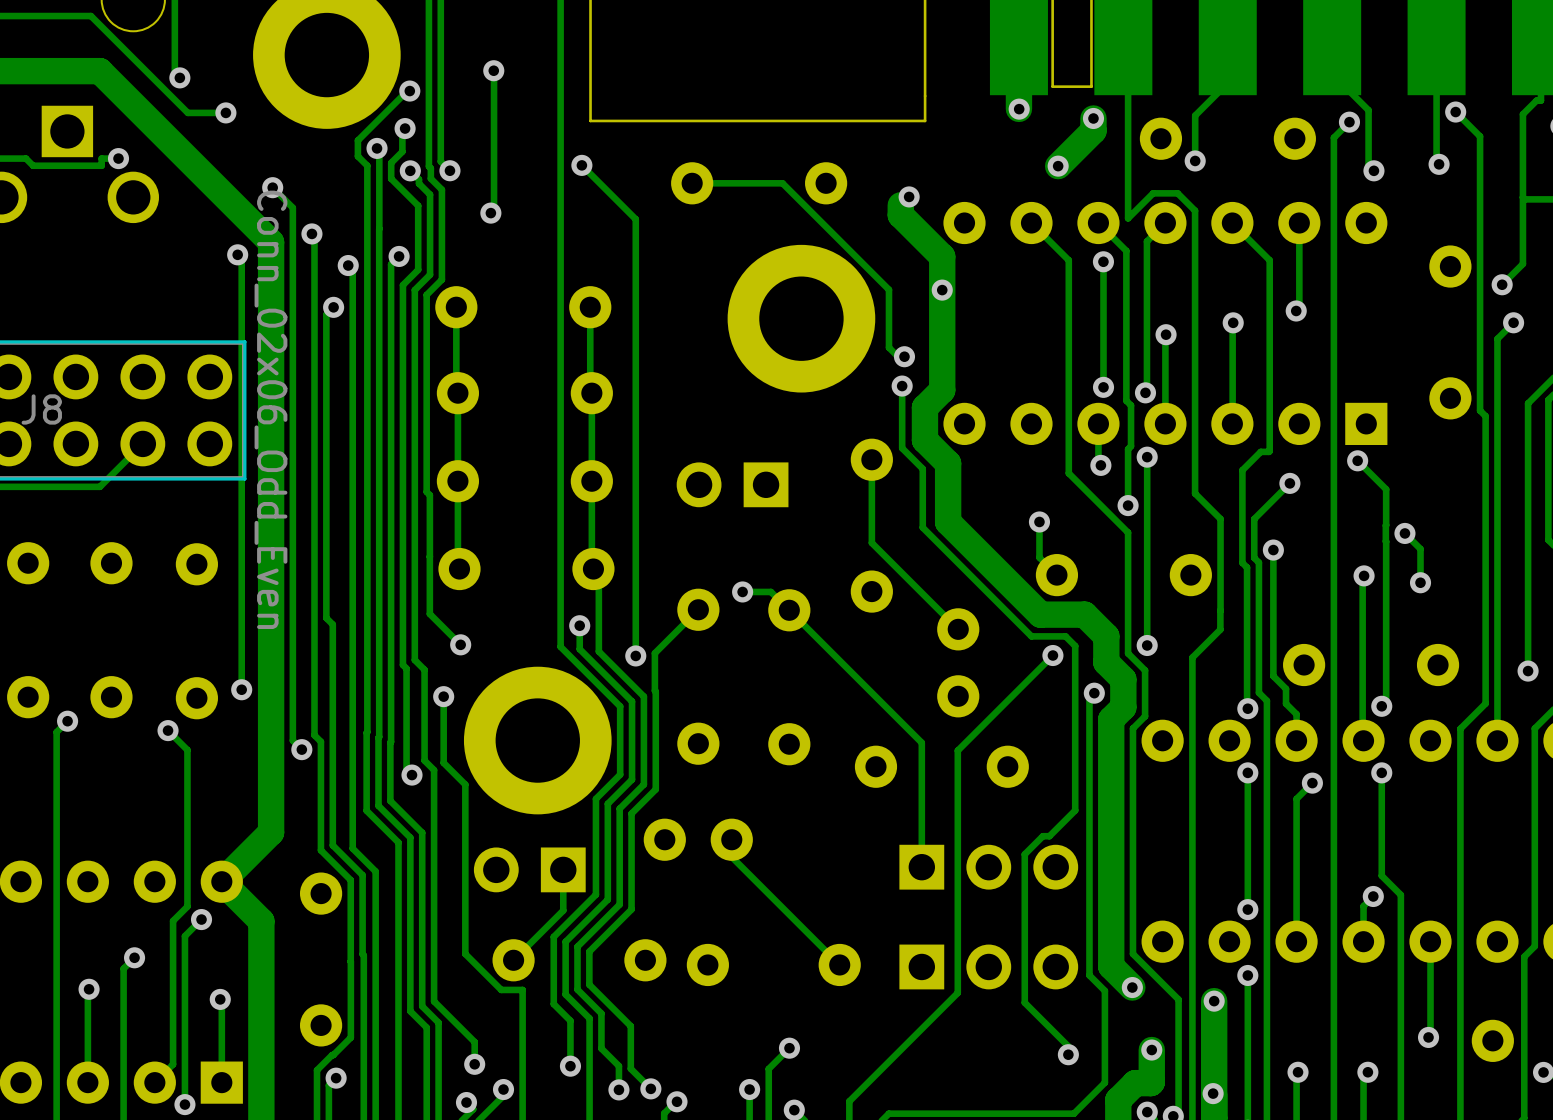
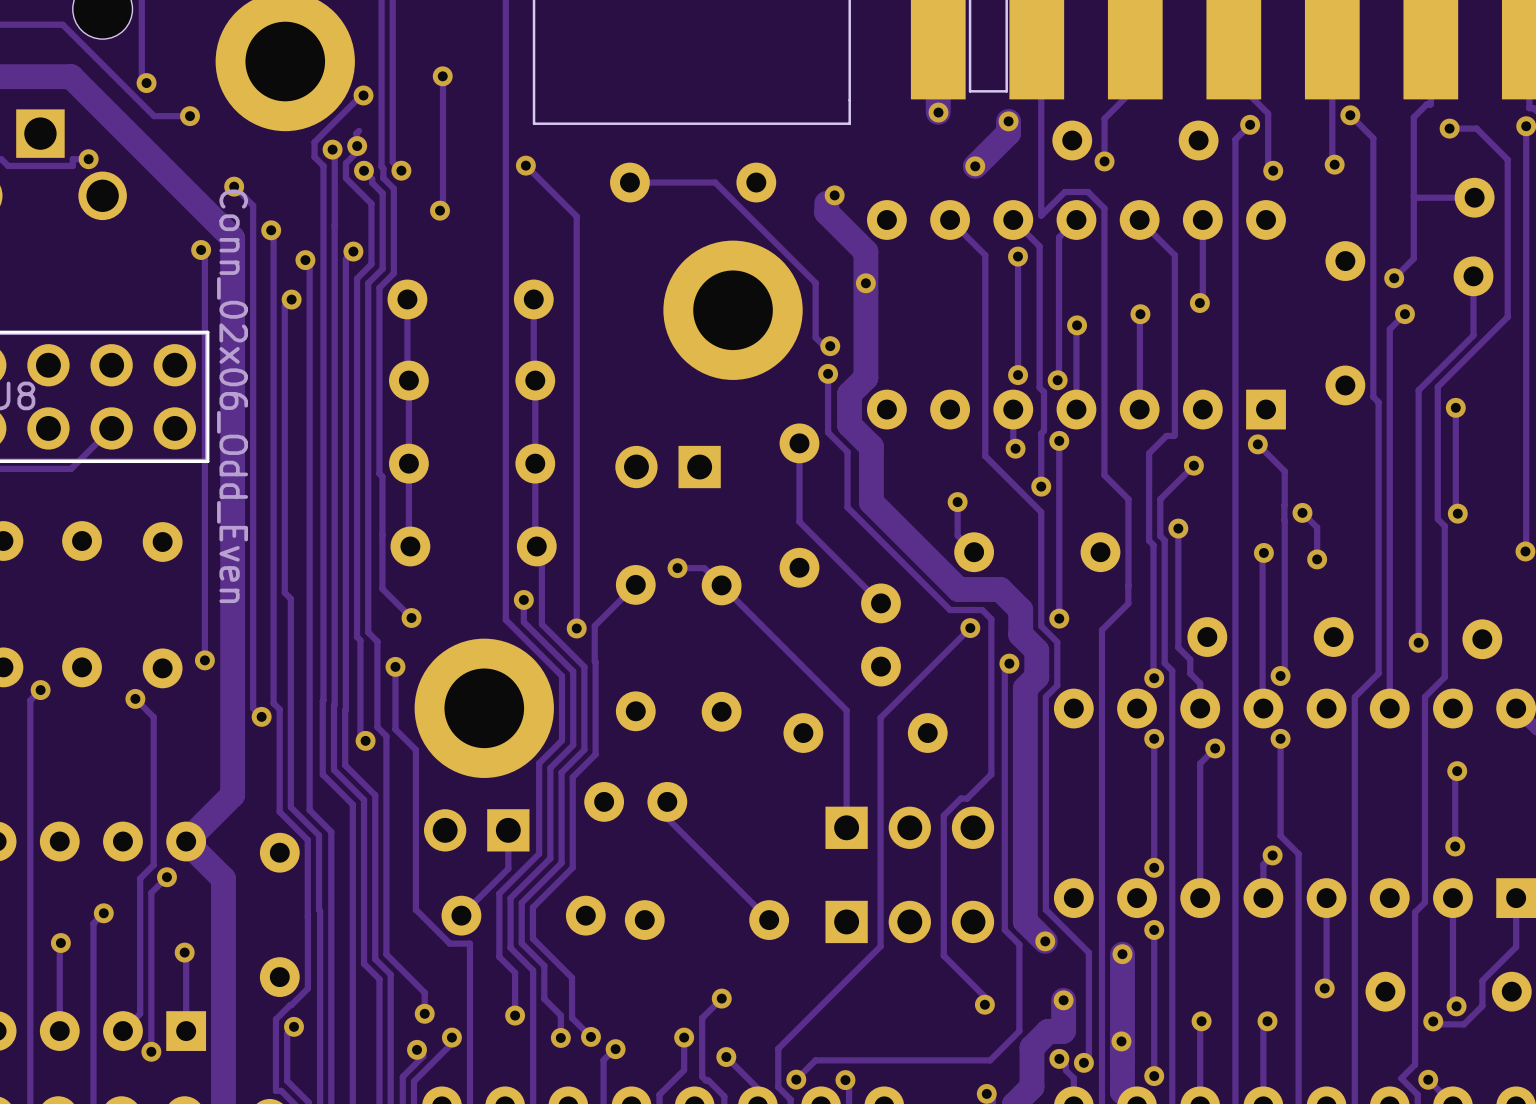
via position: (405, 128) -> (357, 146)

